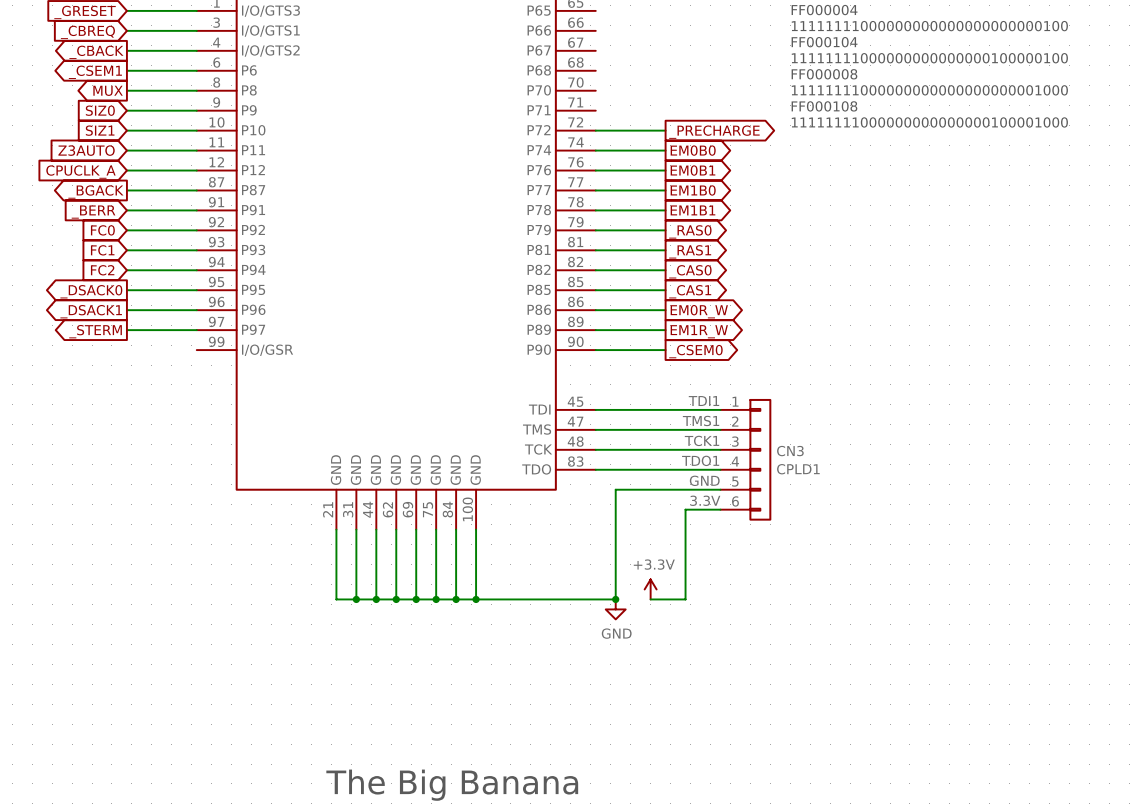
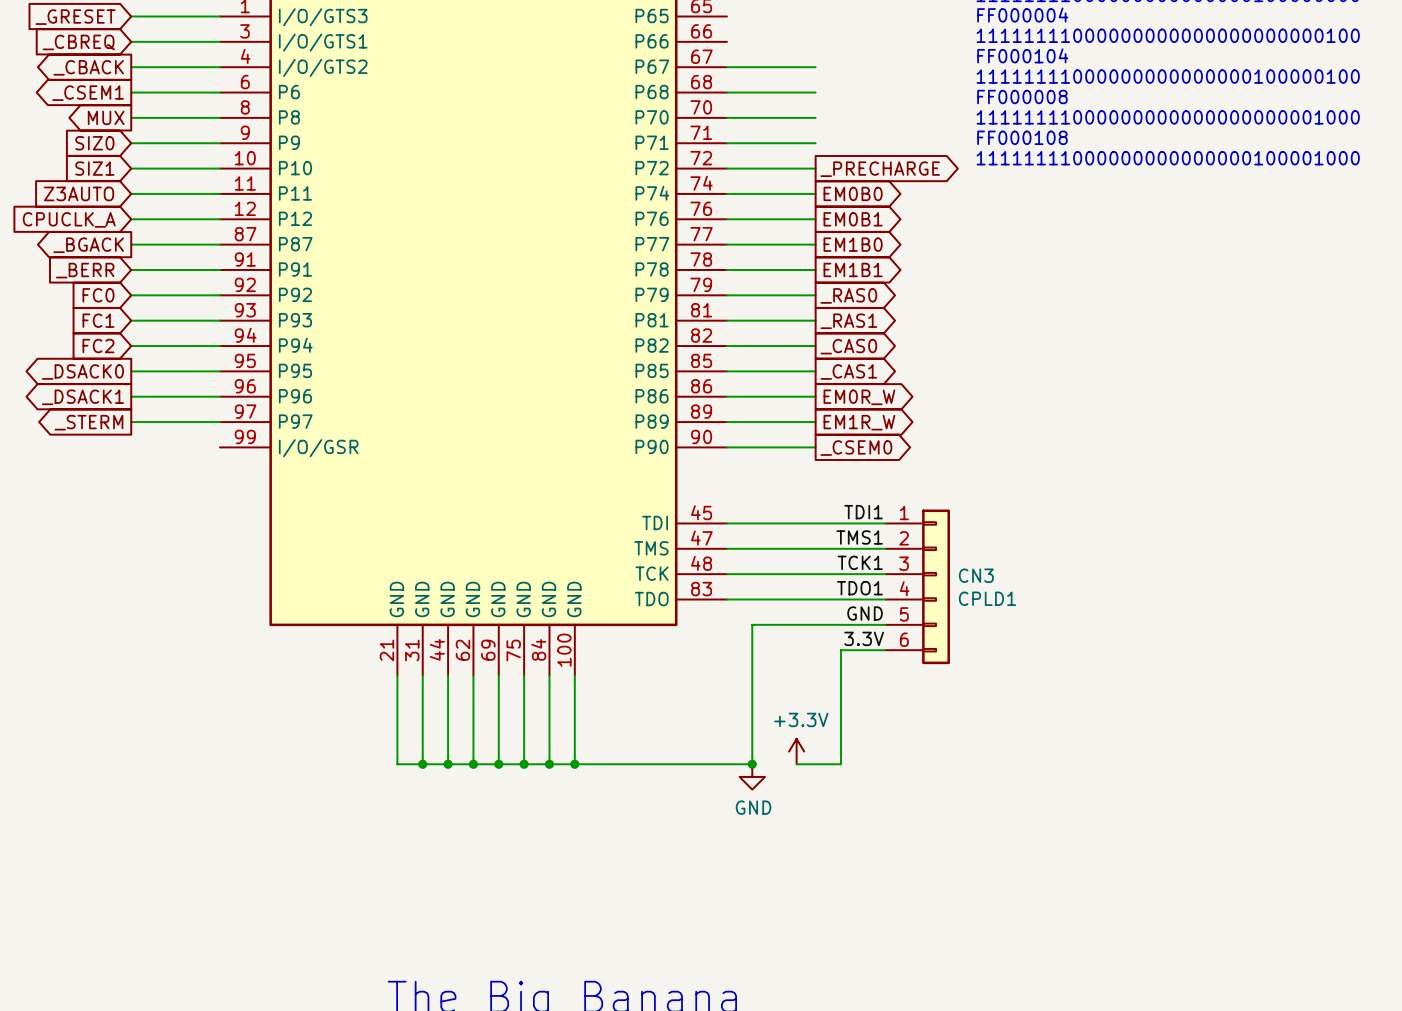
wire: none -> (726, 67) (815, 67)
wire: none -> (726, 92) (815, 92)
wire: none -> (726, 117) (815, 117)
wire: none -> (726, 143) (815, 143)

